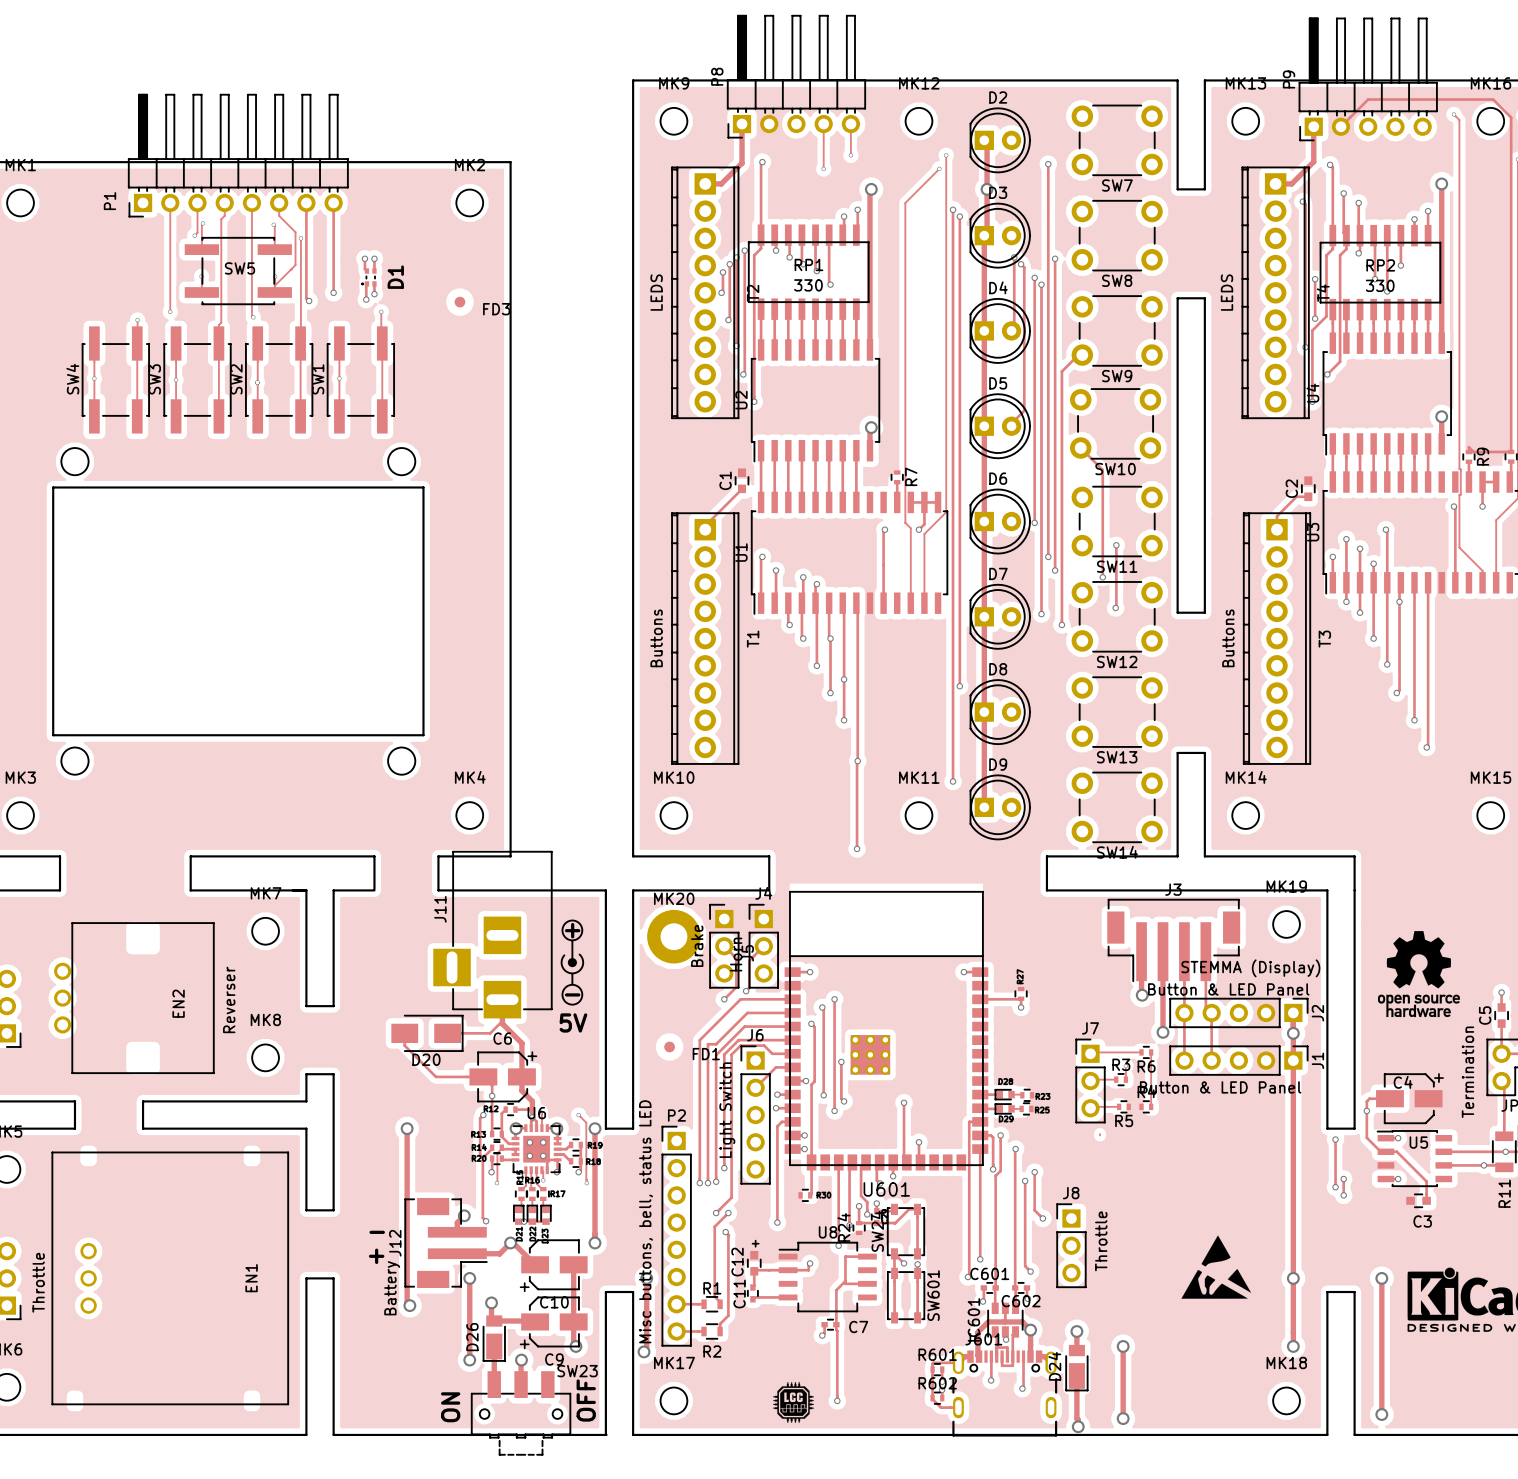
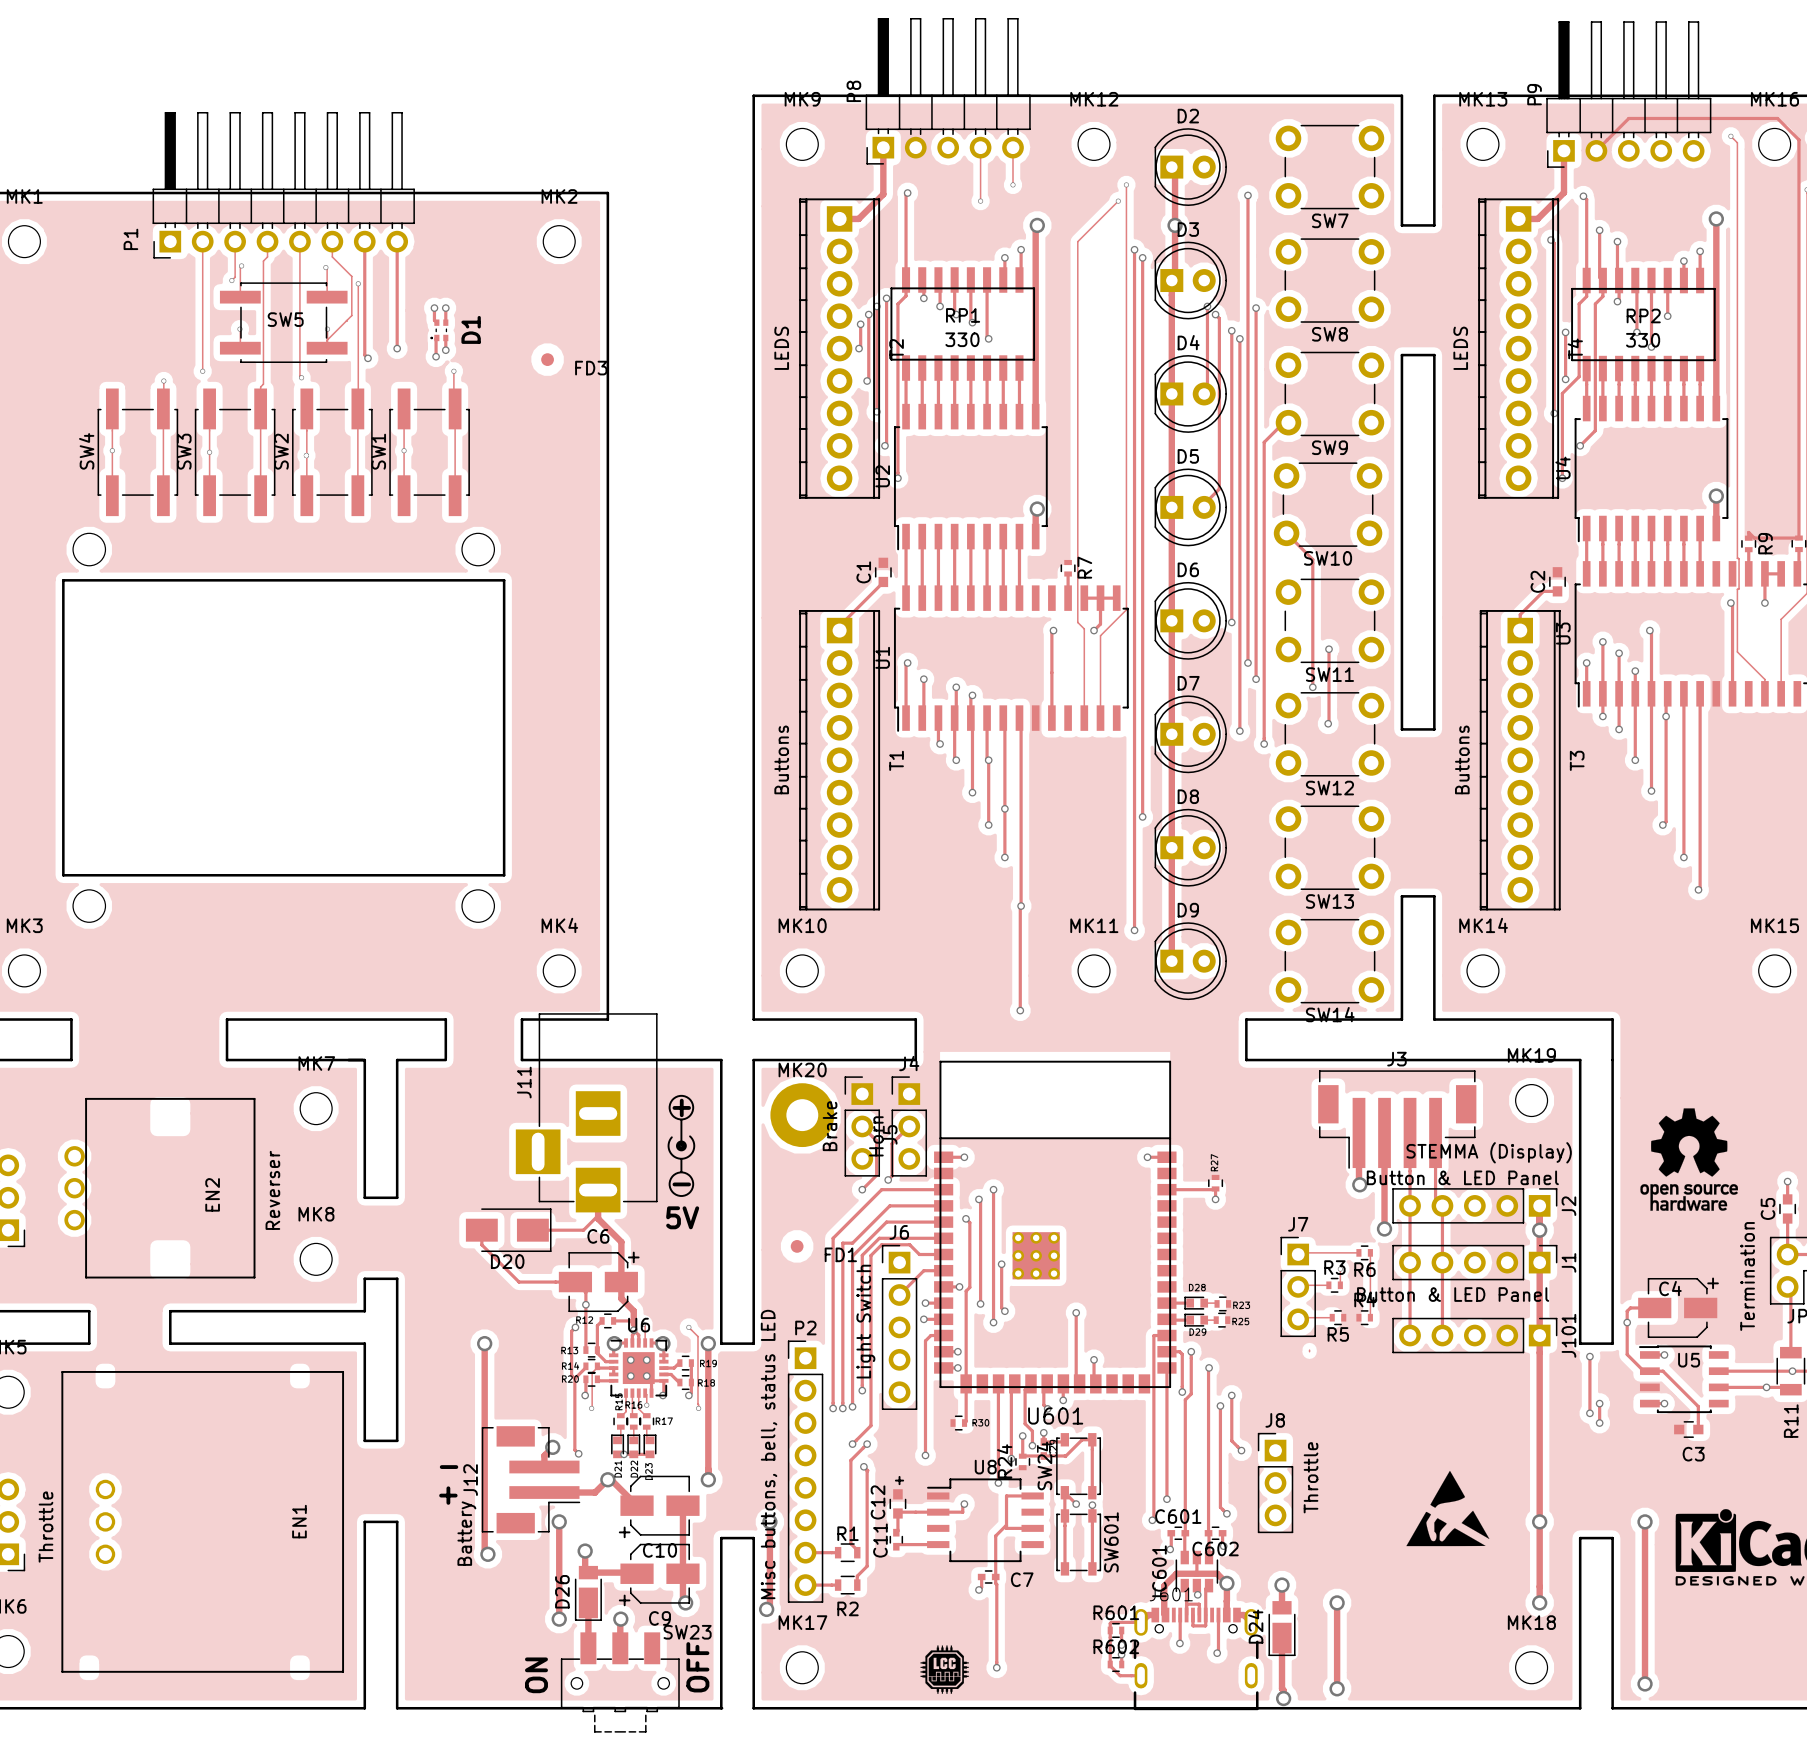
track: none -> (1410, 1262) (1410, 1335)
track: none -> (1442, 1262) (1442, 1335)
J101: none -> (1474, 1335)

